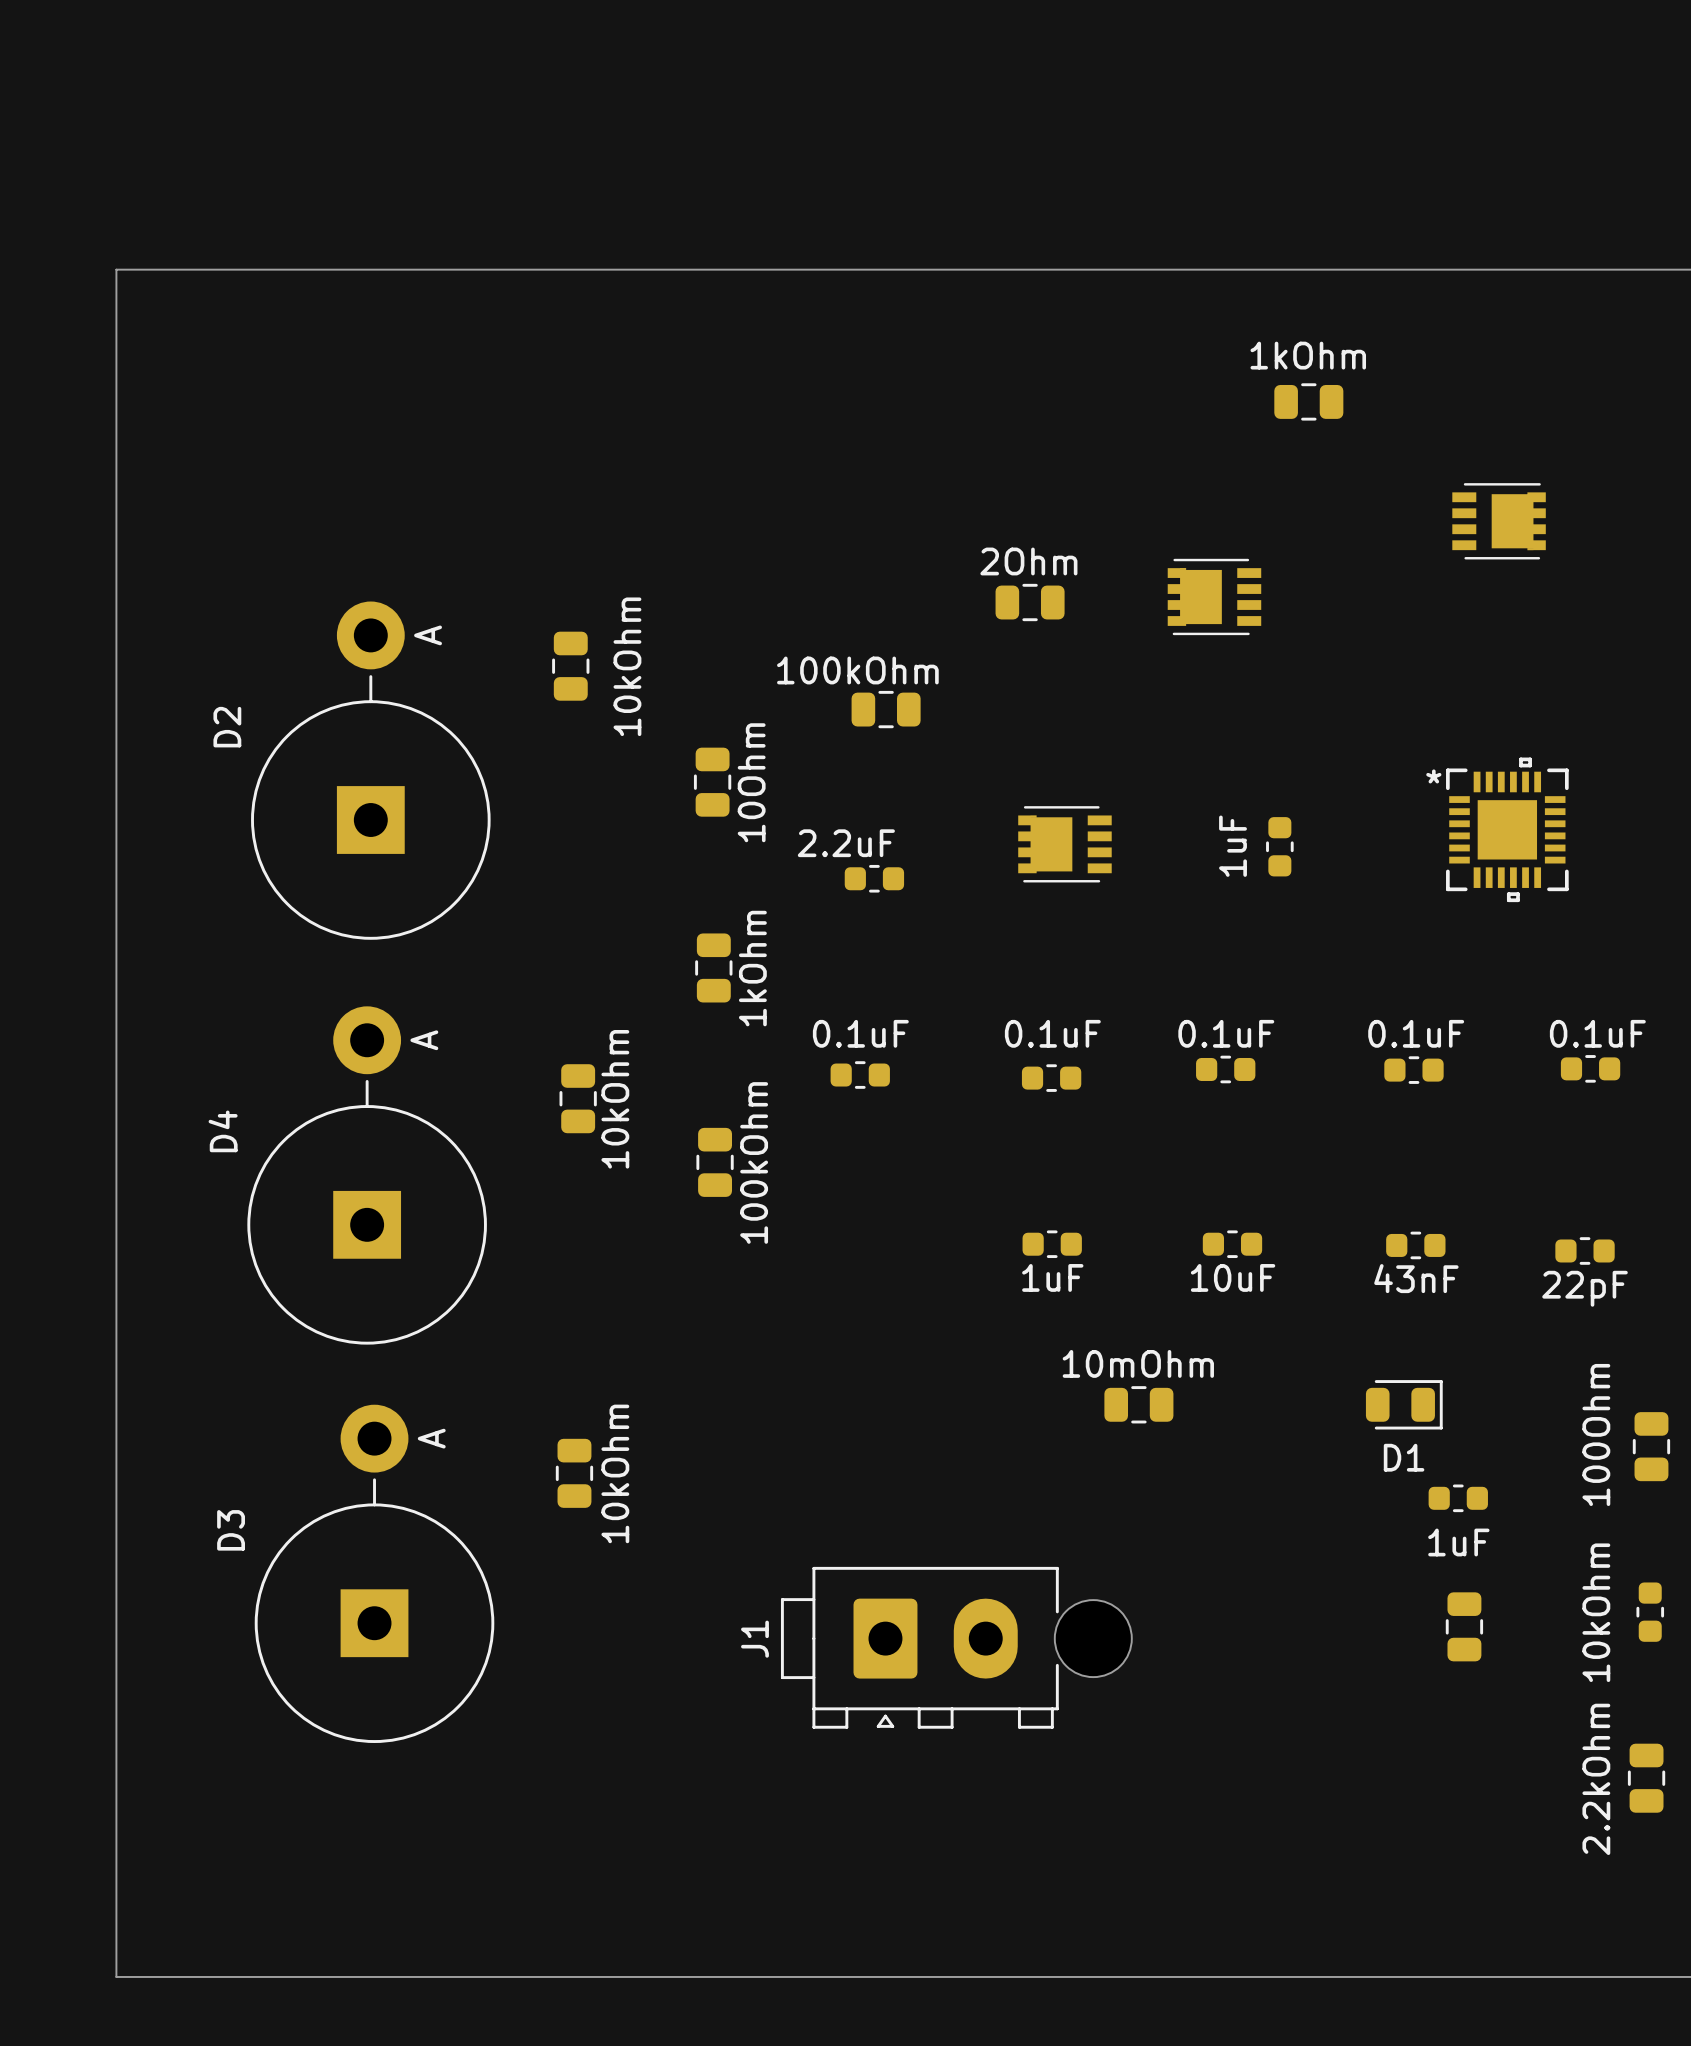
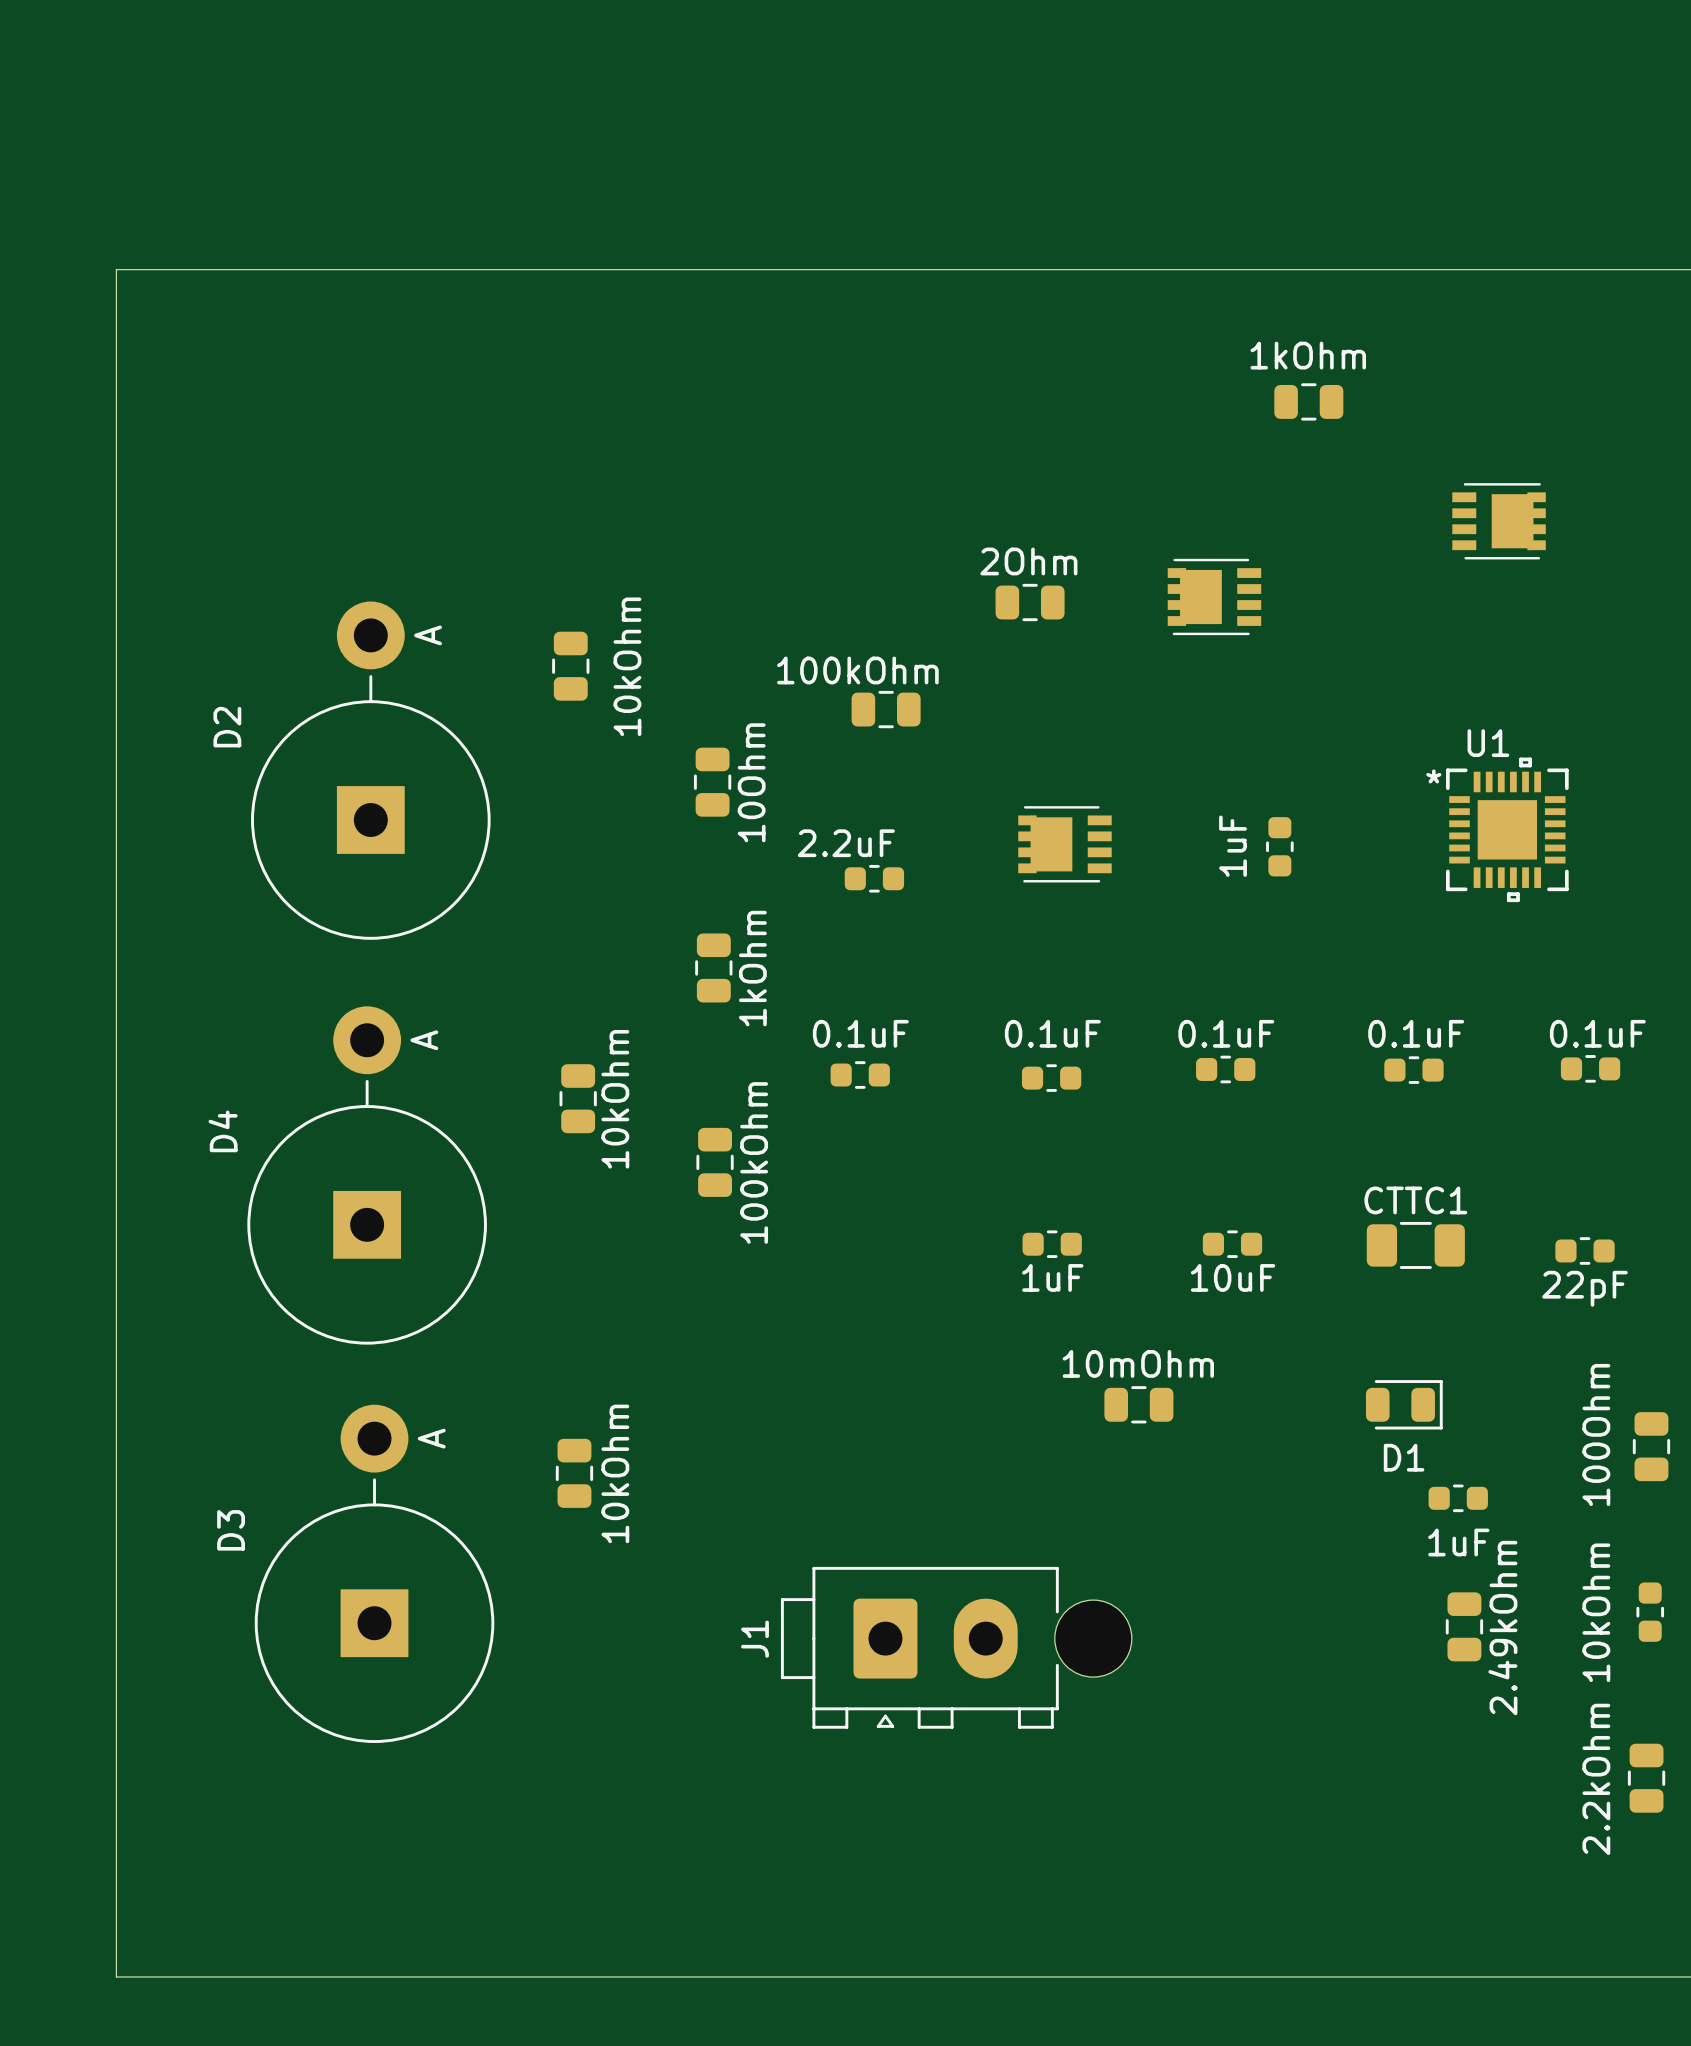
text: none -> U1 (1488, 743)
part: 43nF (1415, 1245) -> none
CTTC1: none -> (1415, 1245)
part value: none -> 2.49kOhm (1502, 1628)

